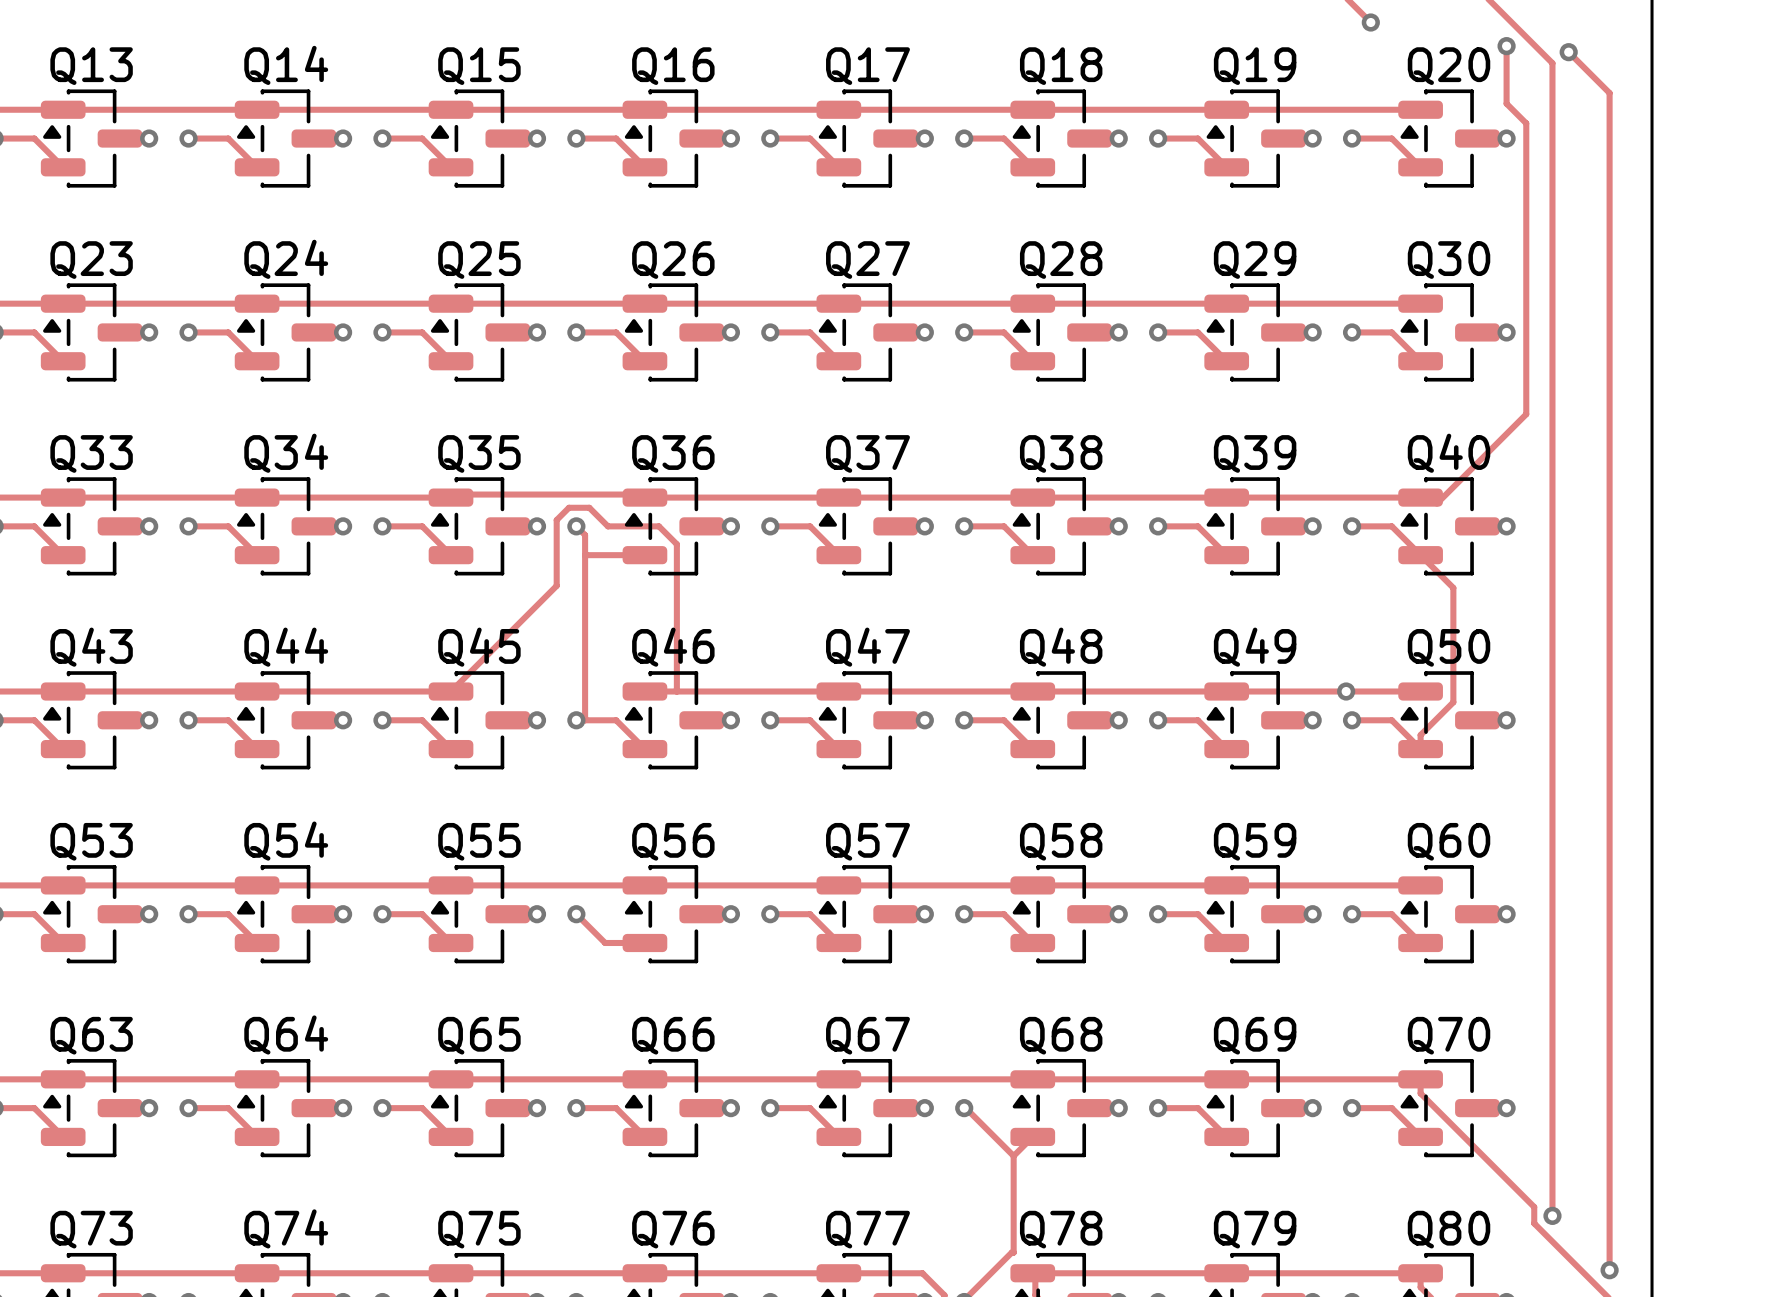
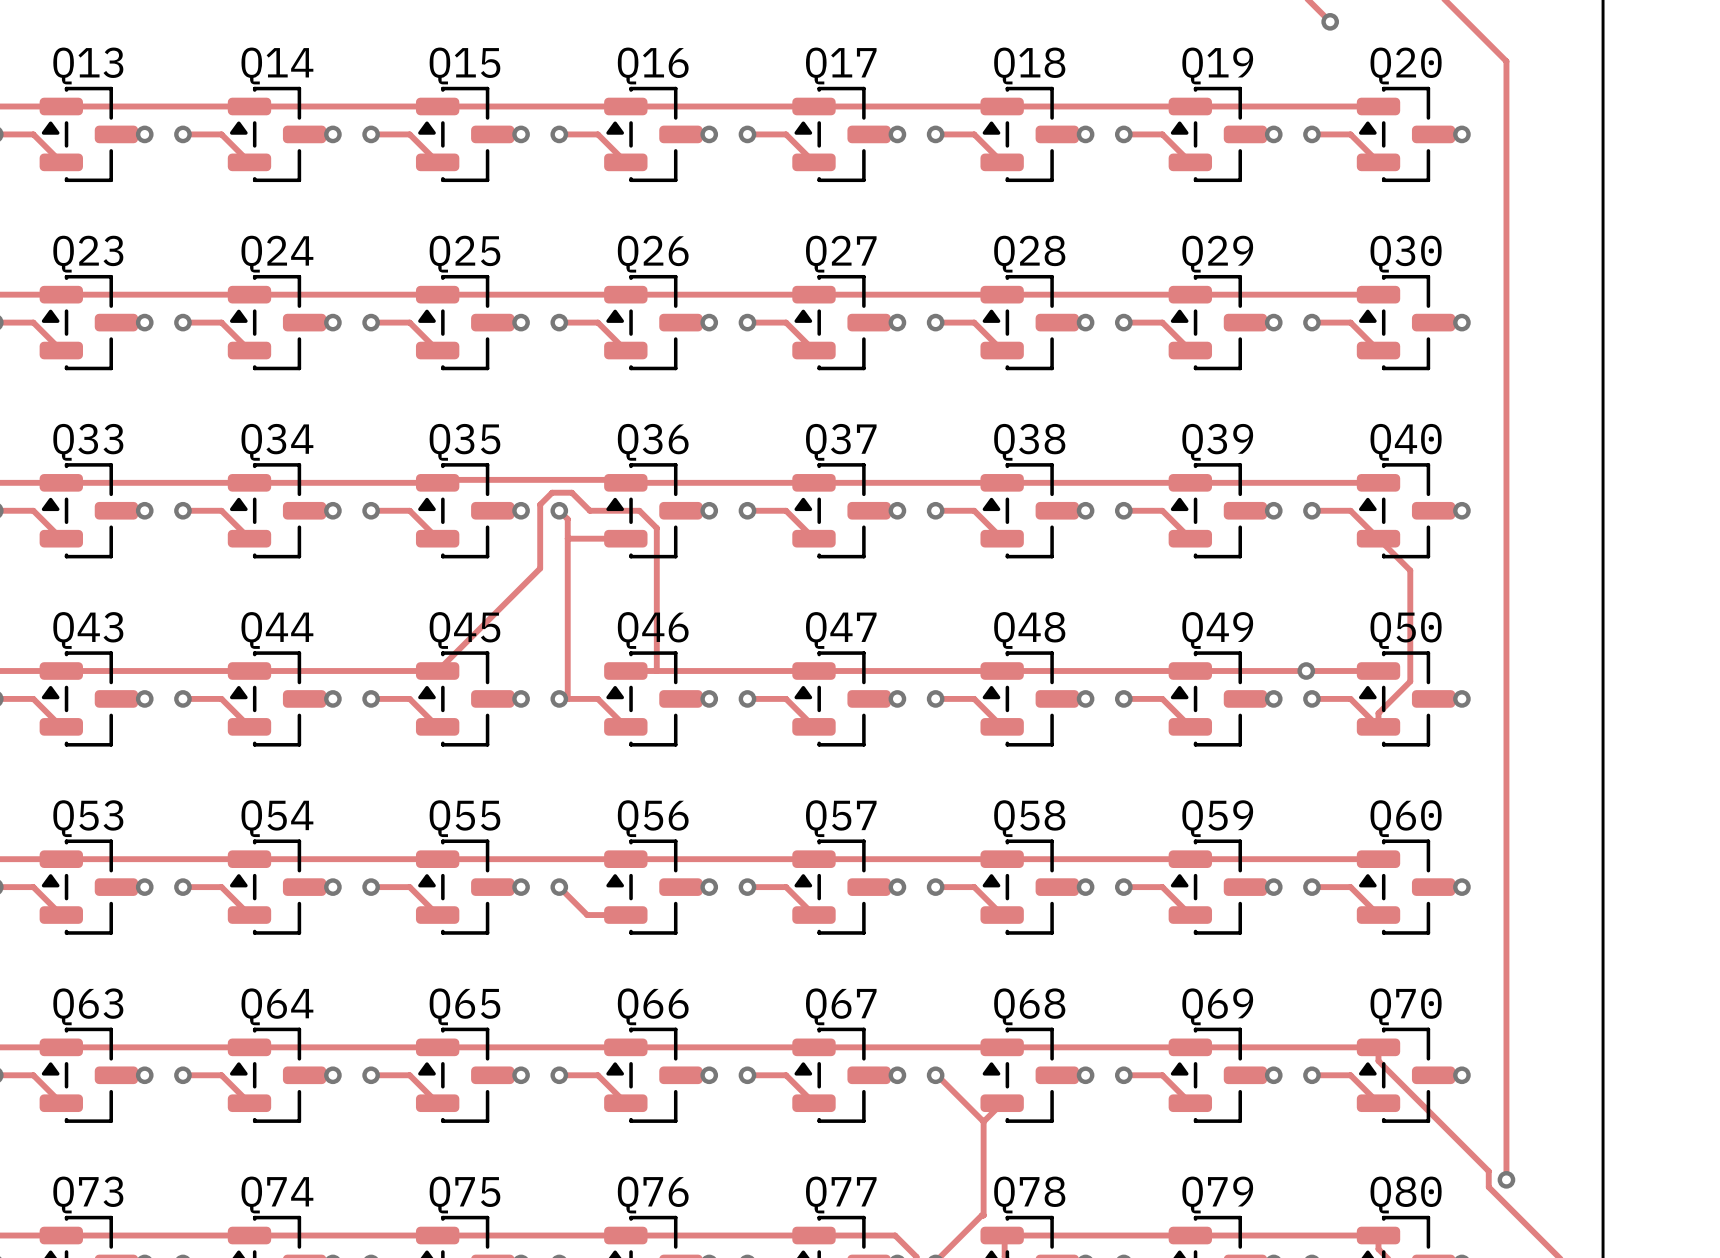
track: (1506, 46) (1506, 103) (1526, 123) (1526, 414) (1436, 503) -> none
via: (1506, 46) -> none
track: (1568, 52) (1609, 93) (1609, 1270) -> none
via: (1568, 52) -> none
via: (1609, 1270) -> none

